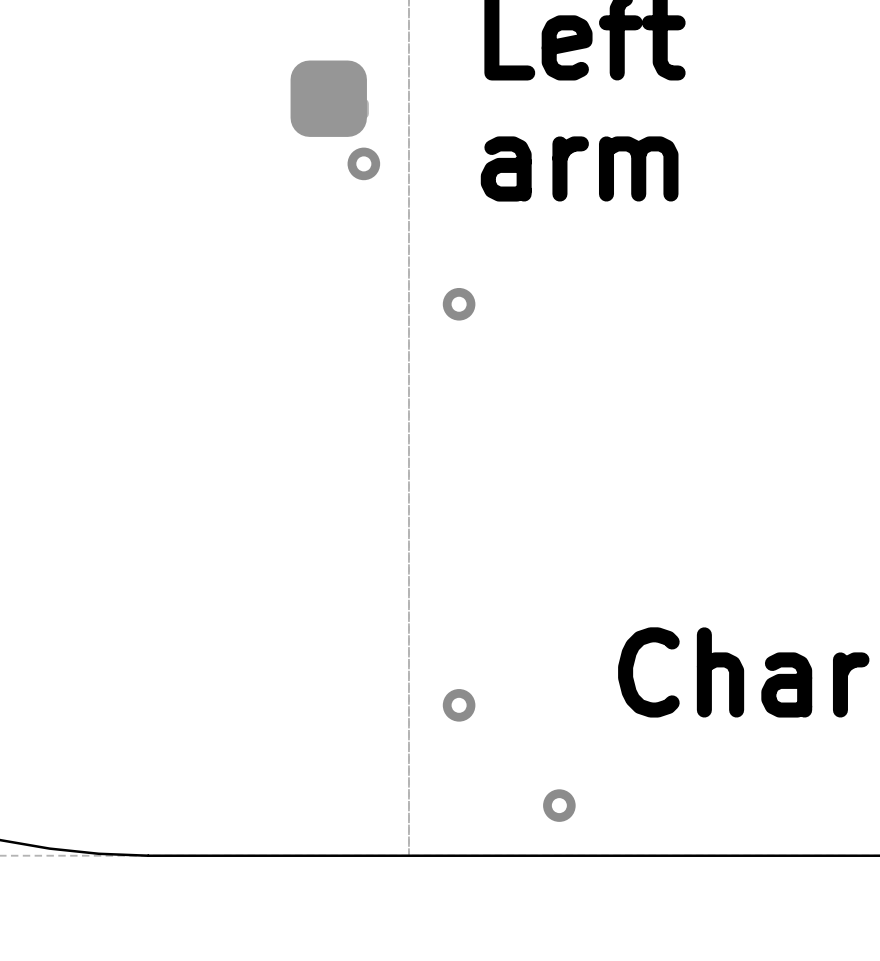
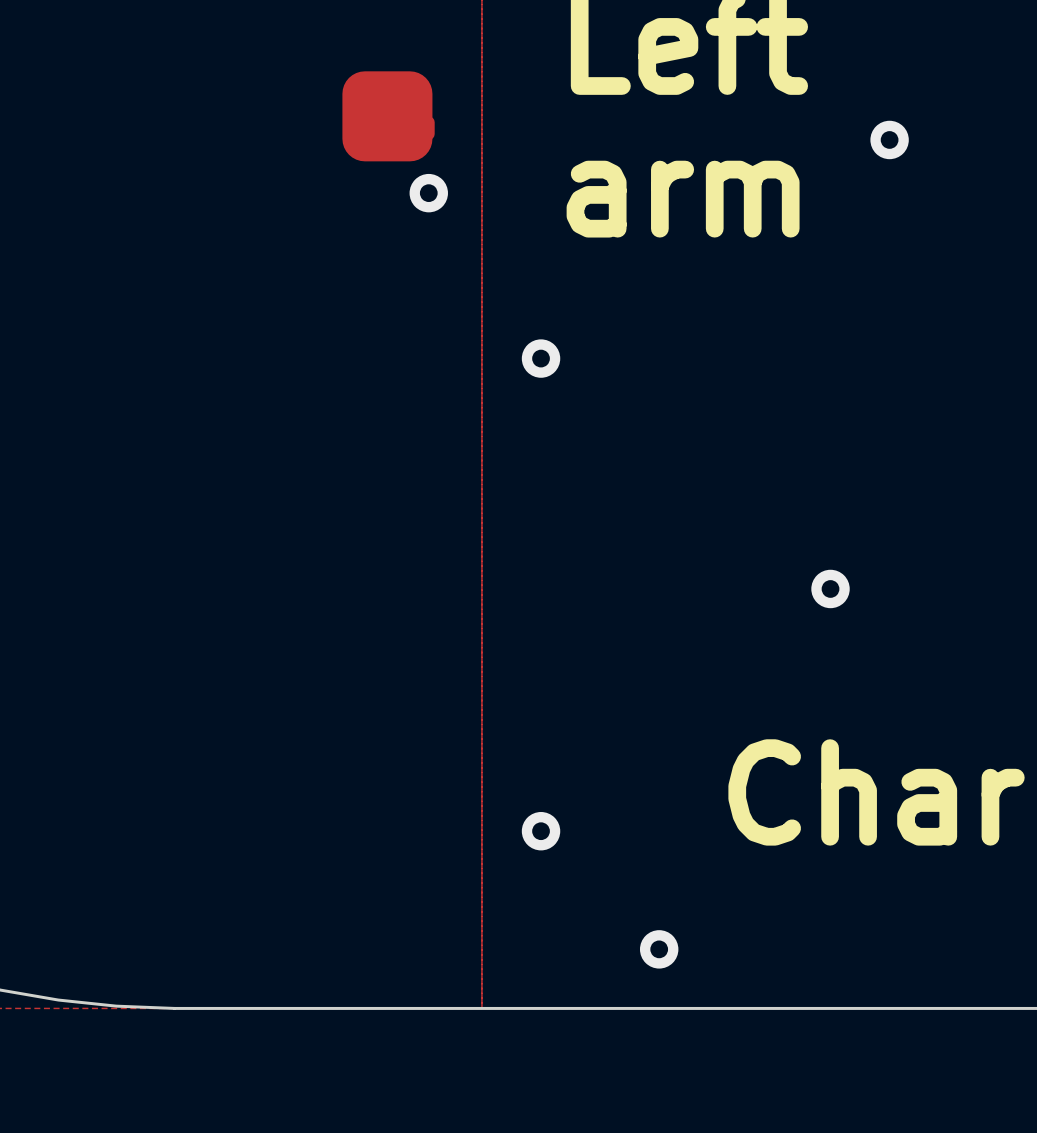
via: none -> (889, 139)
via: none -> (830, 588)

